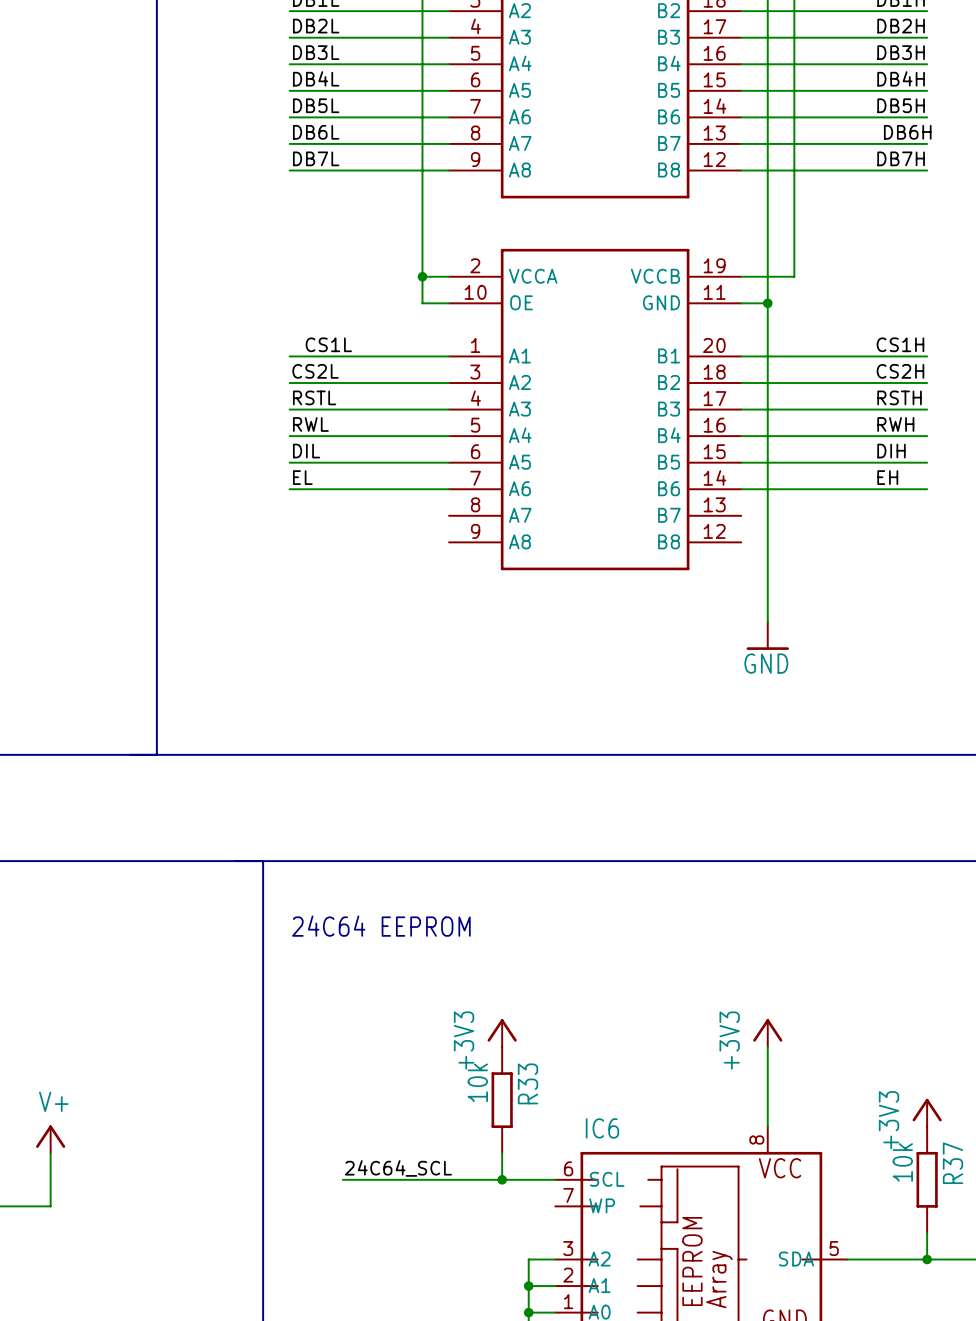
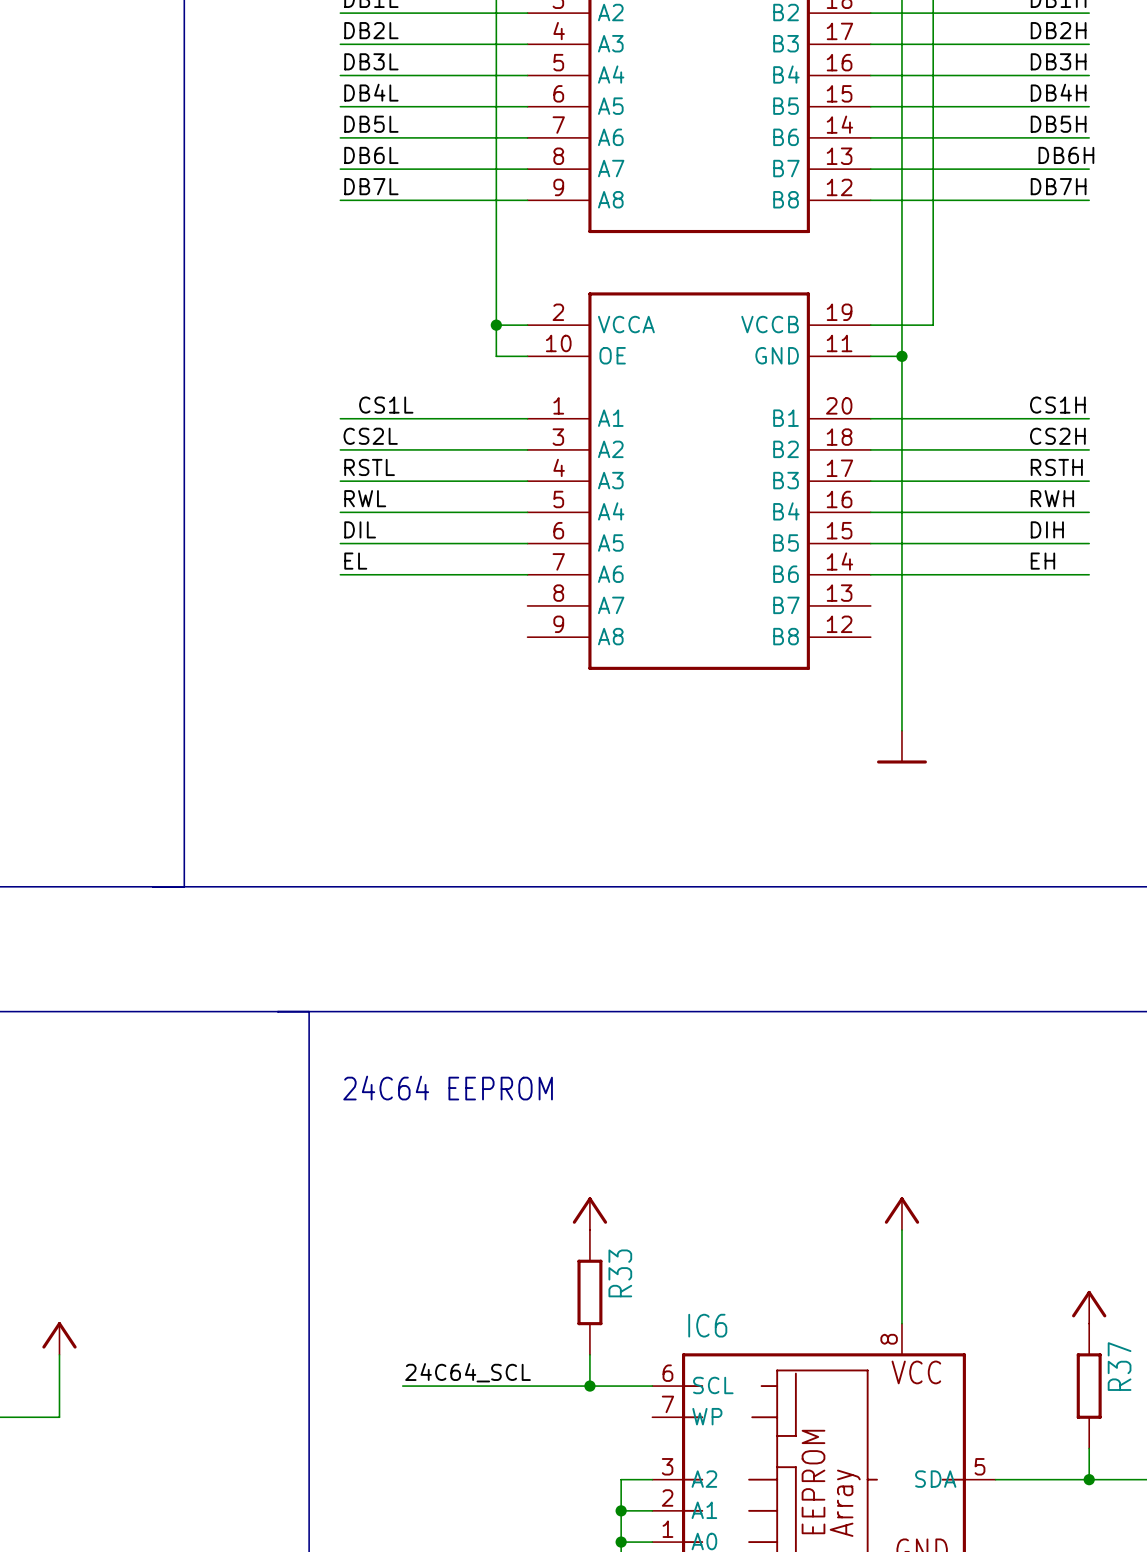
power symbol text: GND (766, 663) -> none
power symbol text: +3V3 (464, 1040) -> none
power symbol text: +3V3 (729, 1040) -> none
R33 value: 10k (477, 1082) -> none
power symbol text: V+ (53, 1101) -> none
power symbol text: +3V3 (889, 1120) -> none
R37 value: 10k (902, 1162) -> none

